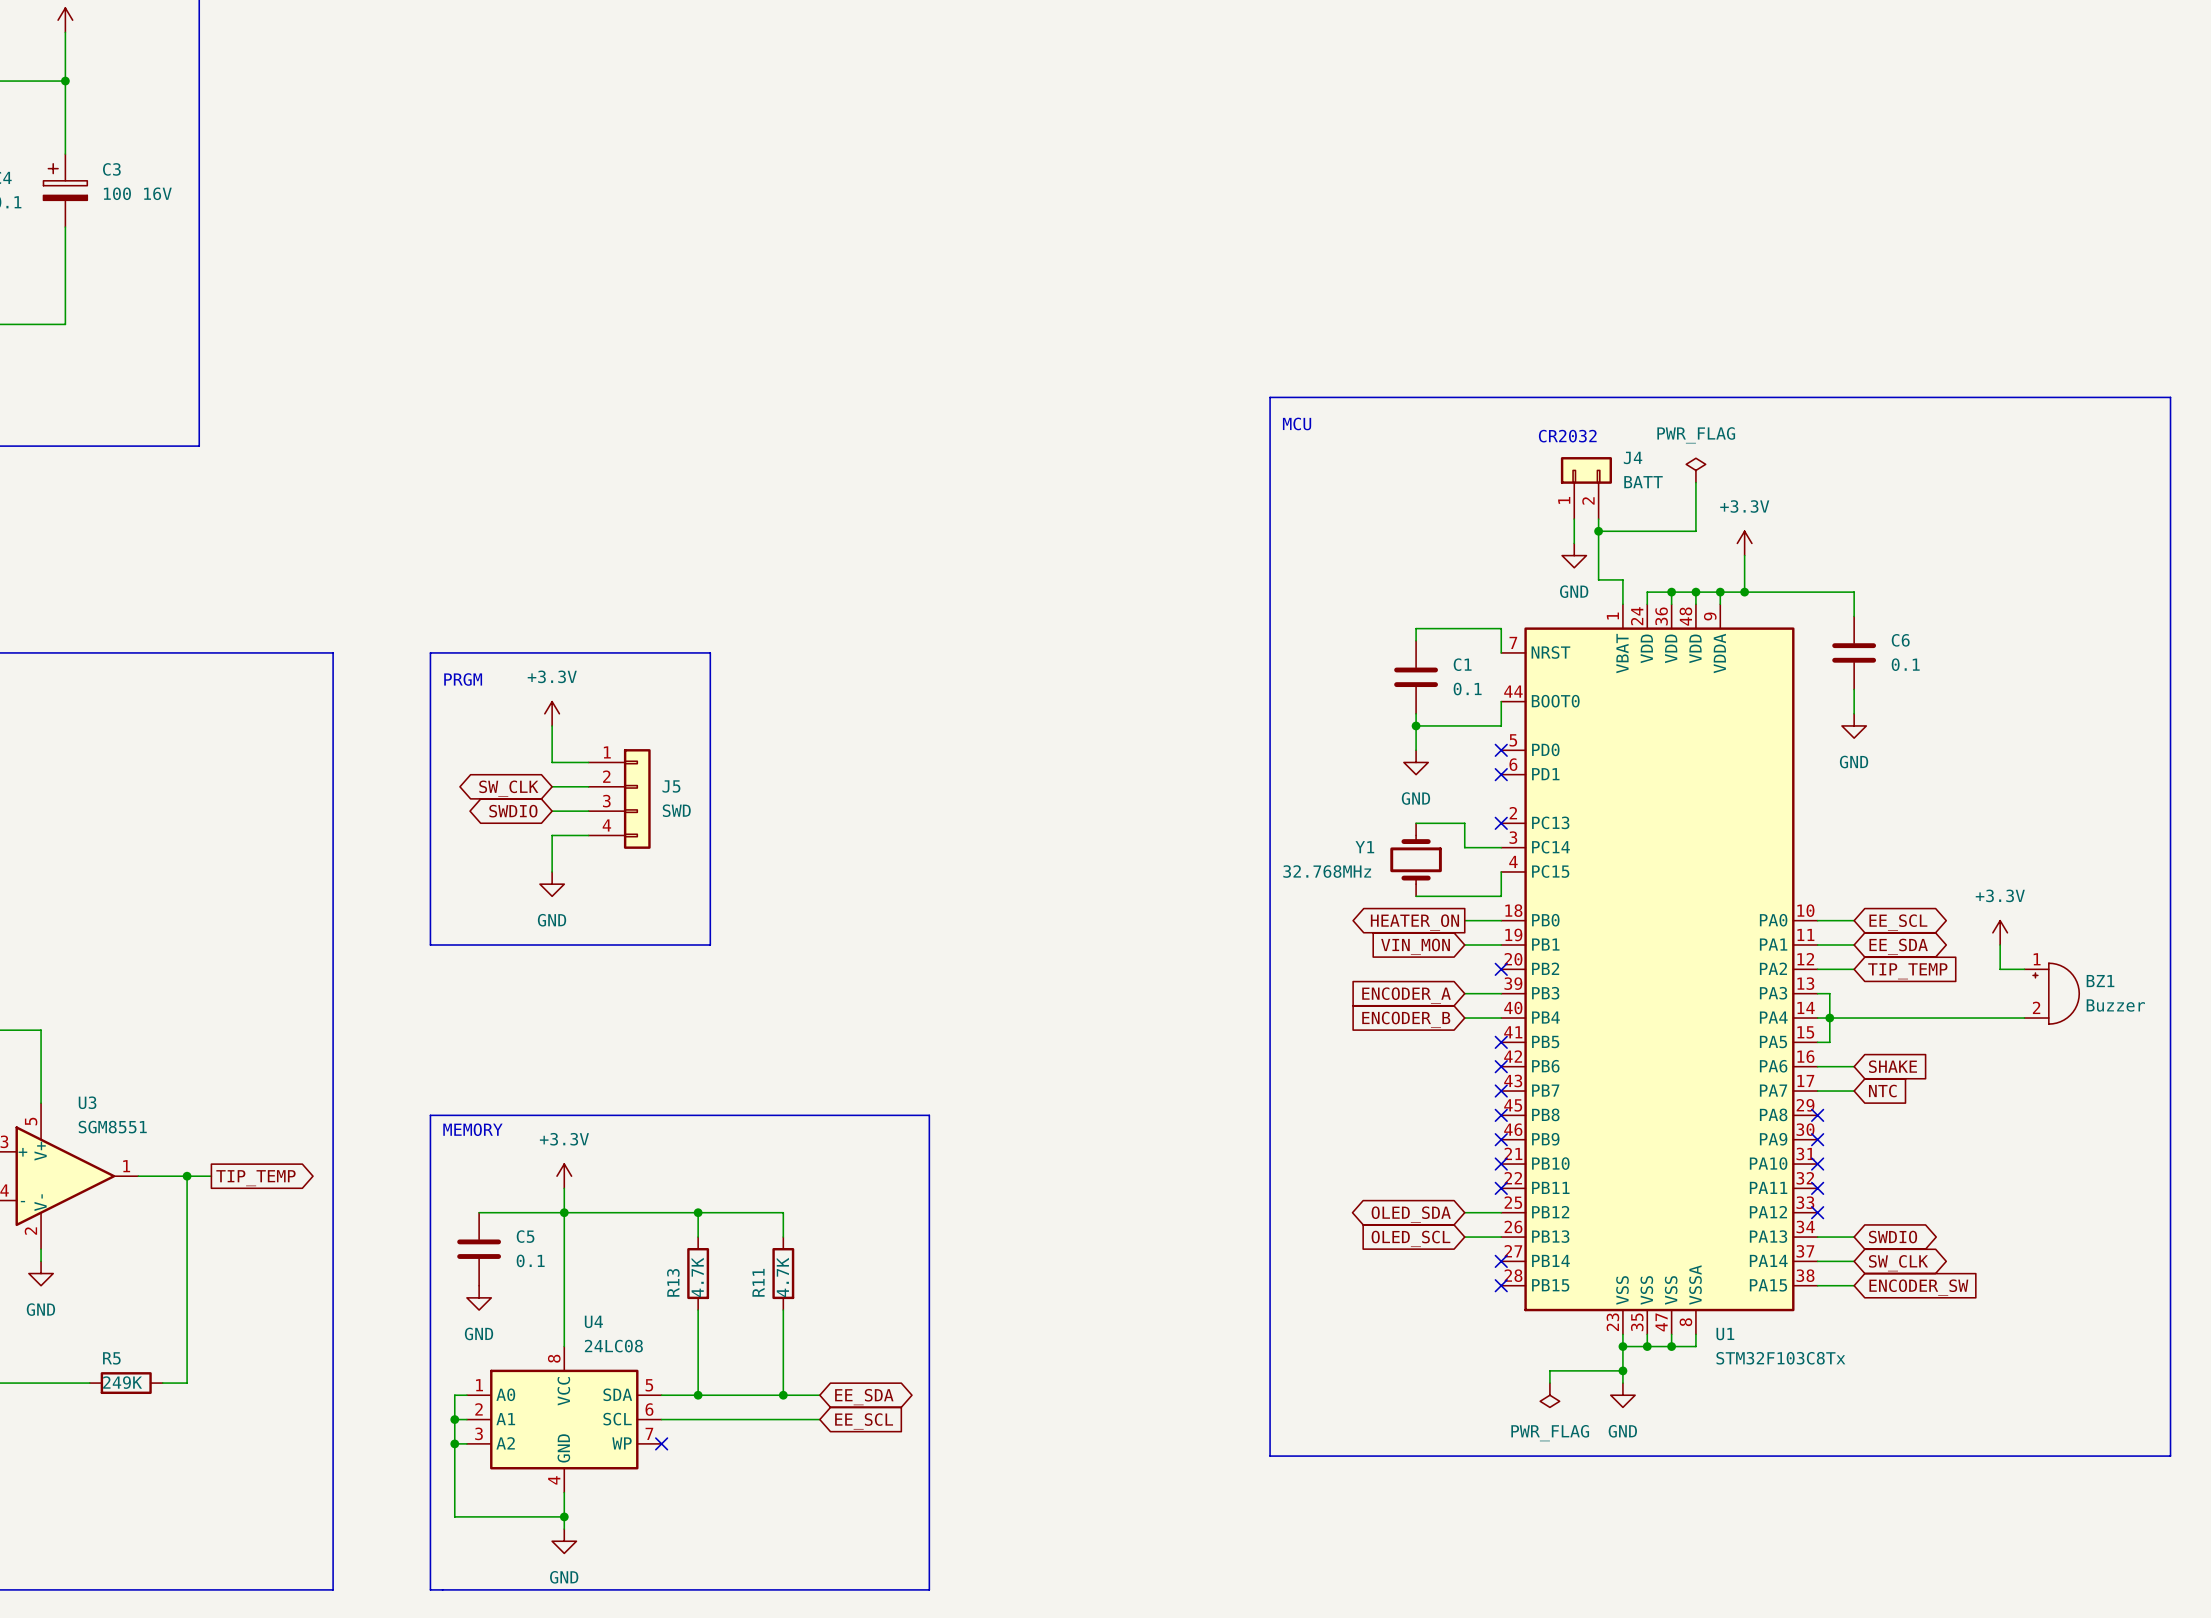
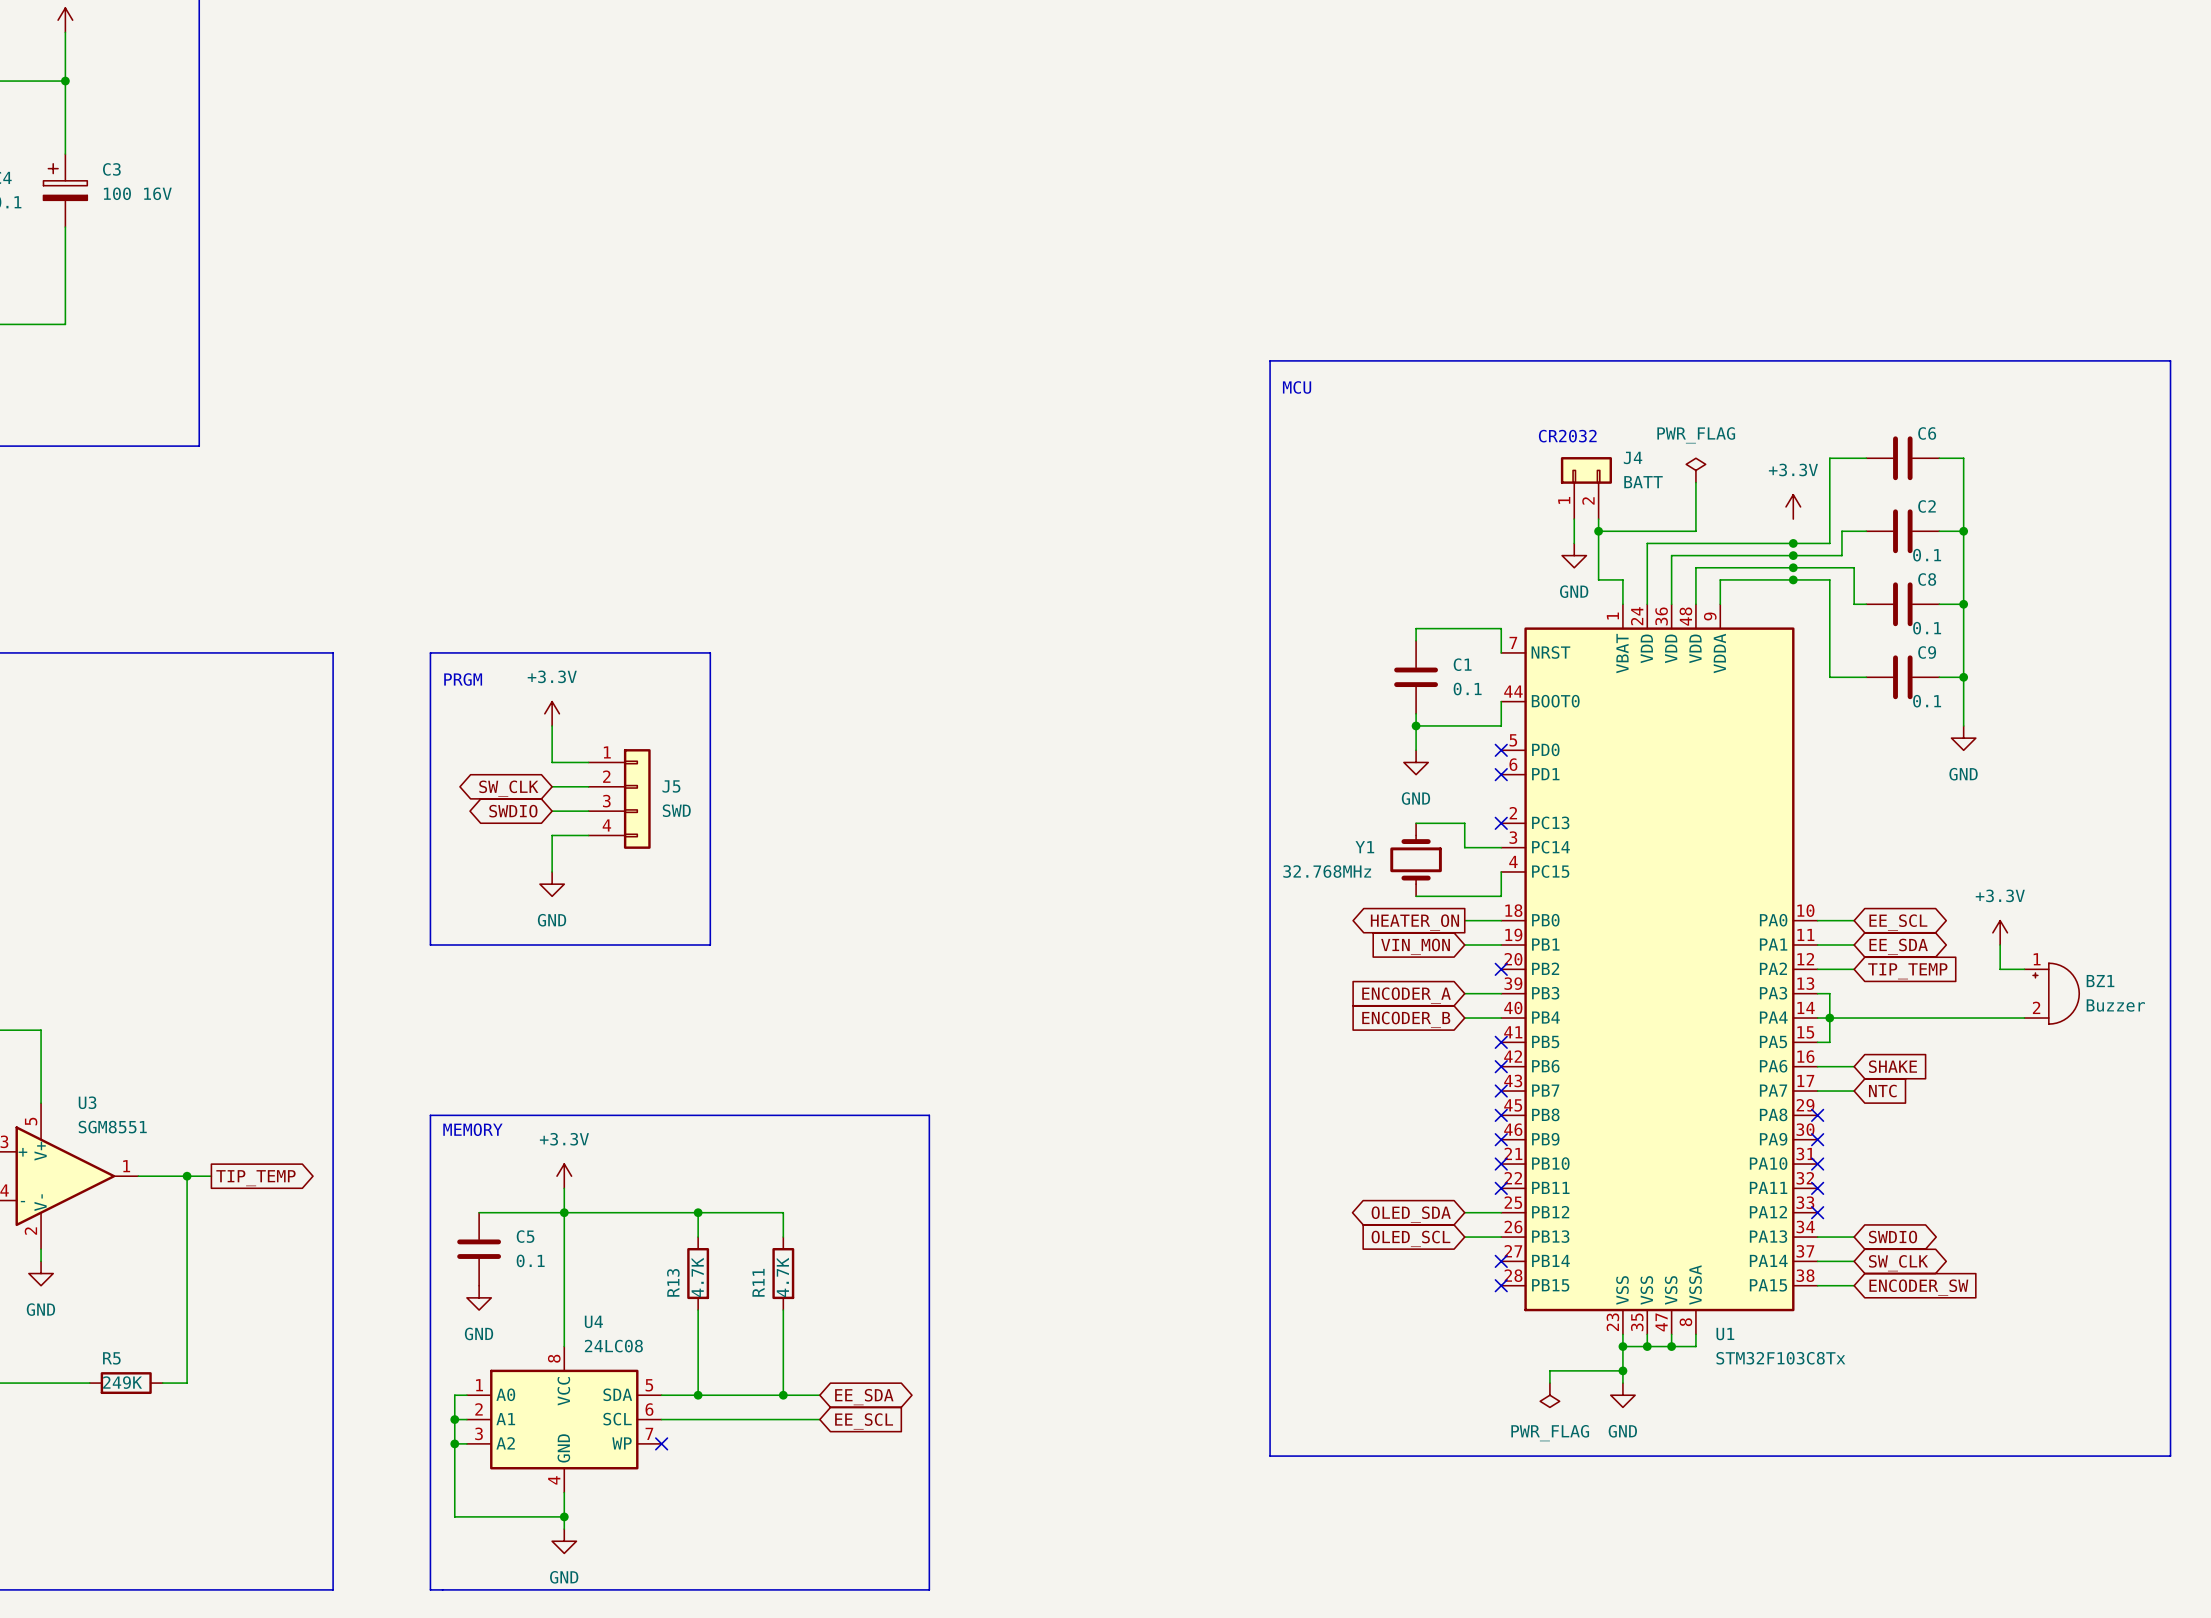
line: (1270, 397) (2170, 397) -> (1270, 397) (1270, 360) (2170, 360) (2170, 397)
text position: MCU (1297, 423) -> MCU (1297, 387)
wire: none -> (1866, 458) (1829, 458) (1829, 543) (1647, 543) (1647, 592)
wire: none -> (1939, 458) (1963, 458) (1963, 725)
wire: none -> (1866, 531) (1841, 531) (1841, 555) (1671, 555) (1671, 592)
C2: none -> 0.1 (1902, 531)
wire: none -> (1939, 531) (1963, 531)
junction: none -> (1963, 531)
power symbol position: +3.3V (1744, 543) -> +3.3V (1793, 506)
junction: none -> (1793, 543)
wire: (1744, 555) (1744, 592) -> none
junction: none -> (1793, 555)
junction: none -> (1793, 567)
junction: none -> (1793, 579)
wire: (1647, 592) (1854, 592) -> (1695, 592) (1695, 567) (1854, 567) (1854, 592)
junction: (1671, 592) -> none
junction: (1695, 592) -> none
wire: none -> (1720, 592) (1720, 579) (1829, 579) (1829, 677) (1866, 677)
junction: (1720, 592) -> none
junction: (1744, 592) -> none
wire: (1854, 604) (1854, 616) -> (1854, 604) (1866, 604)
C8: none -> 0.1 (1902, 604)
wire: none -> (1939, 604) (1963, 604)
junction: none -> (1963, 604)
C6 name position: C6 (1900, 640) -> C6 (1927, 433)
C6 rotation: 0° (1854, 652) -> 90° clockwise (1902, 458)
C6 position: (1854, 652) -> (1902, 458)
C6 value: 0.1 (1905, 664) -> none
C9: none -> 0.1 (1902, 677)
wire: none -> (1939, 677) (1963, 677)
junction: none -> (1963, 677)
wire: (1854, 689) (1854, 713) -> none
power symbol position: GND (1854, 725) -> GND (1963, 738)

